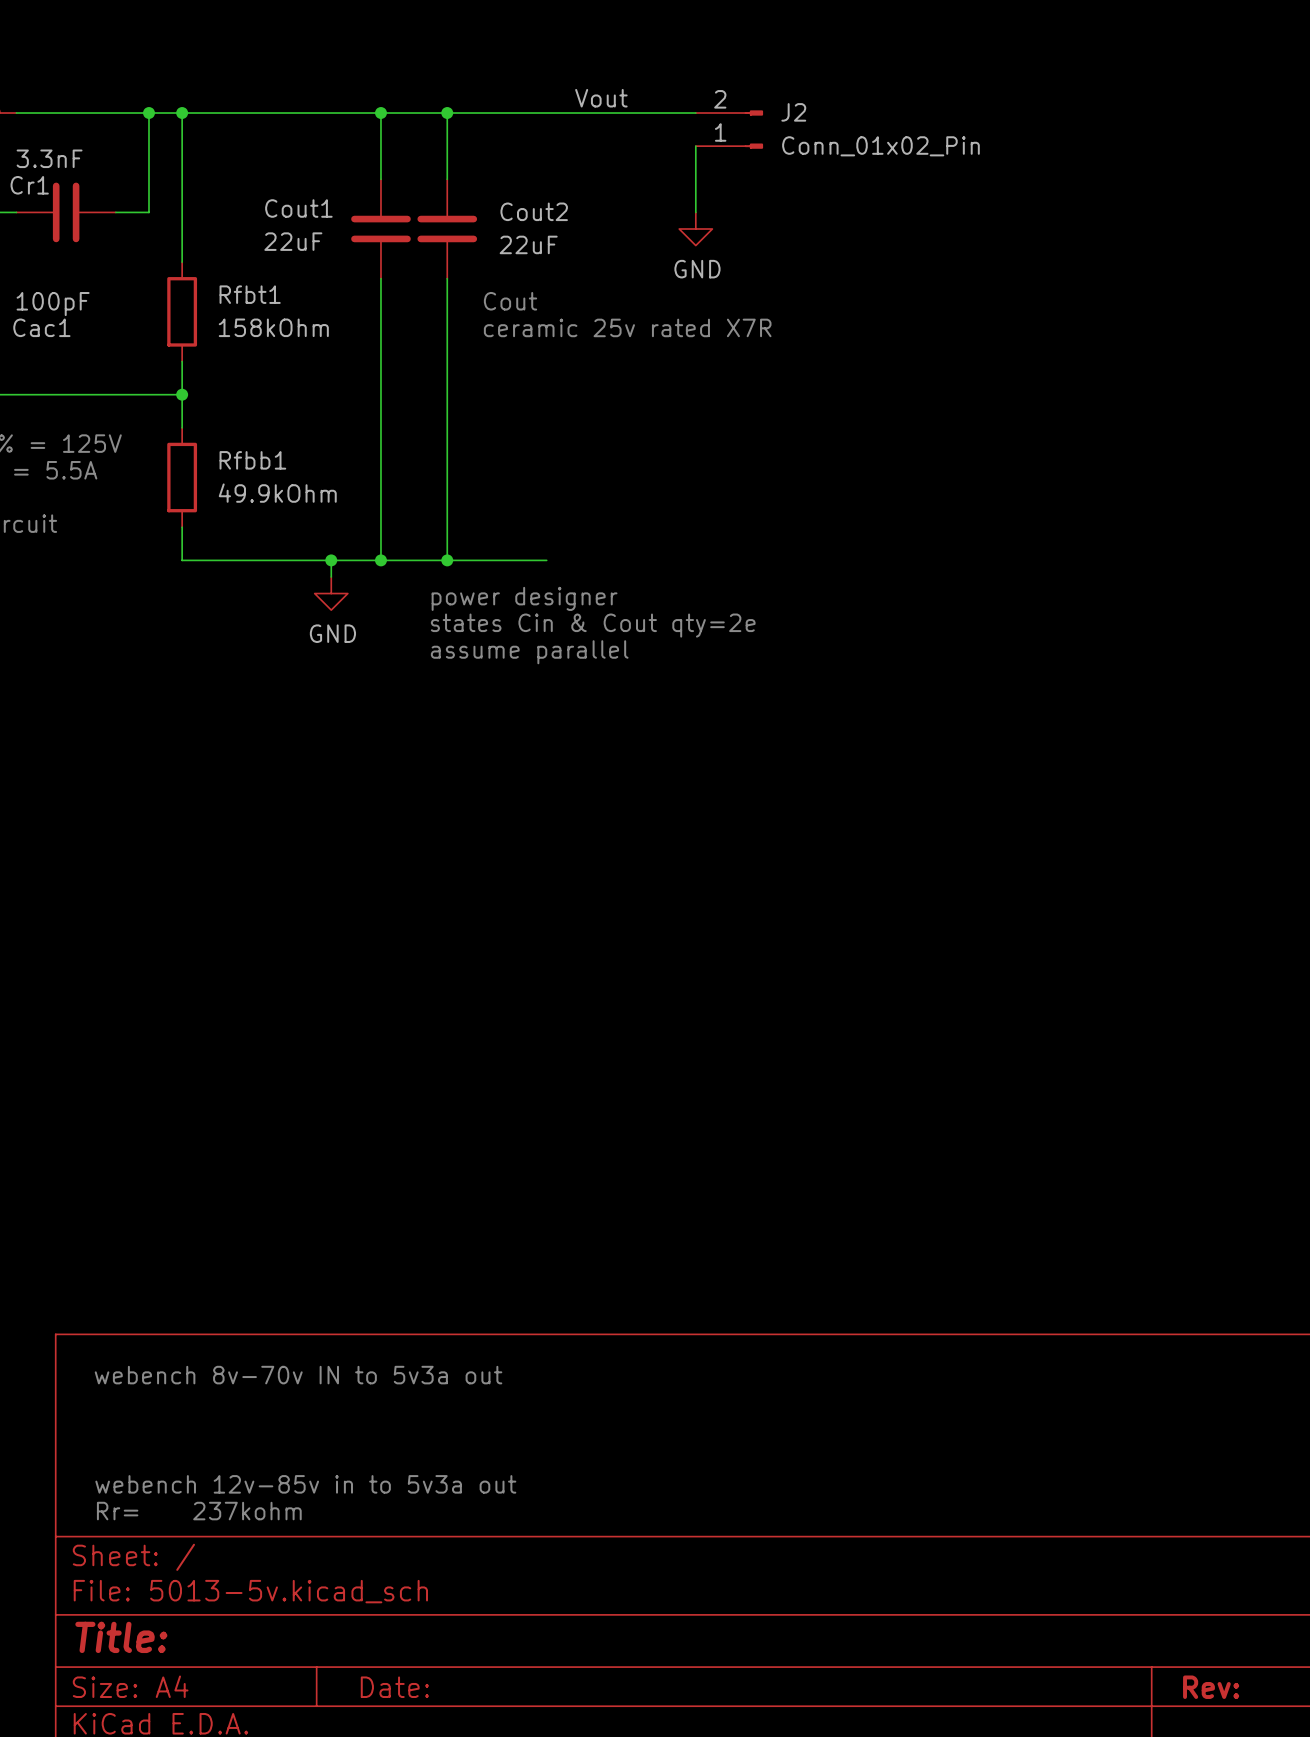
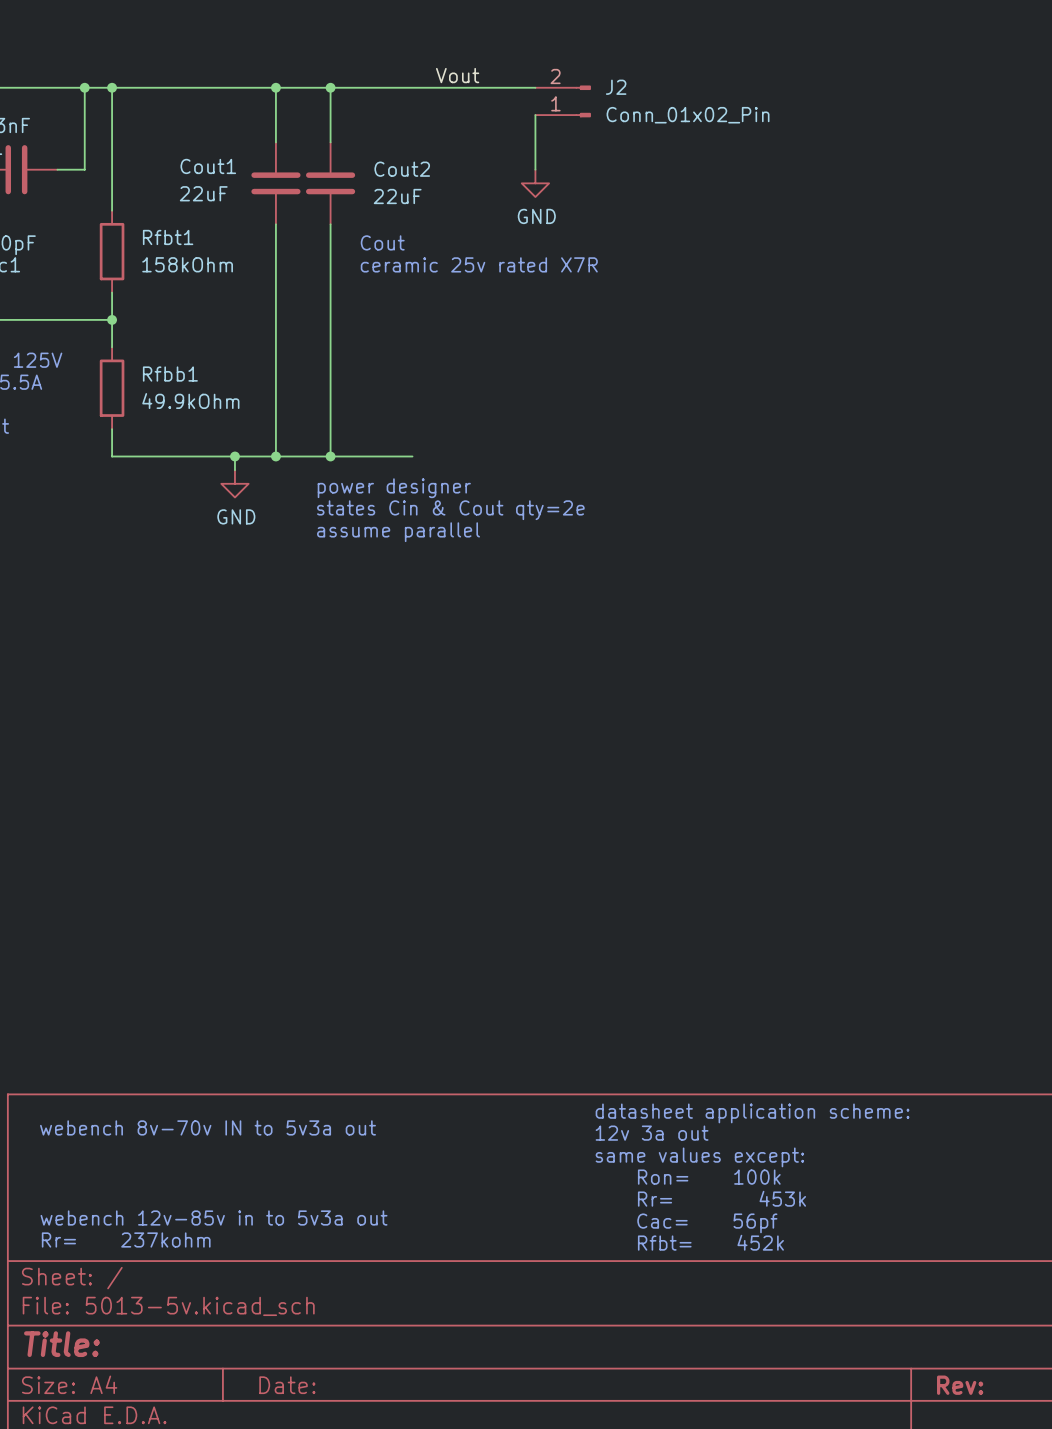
text: none -> datasheet application scheme: (752, 1113)
text: none -> 12v 3a out (652, 1133)
text: none -> same values except: (699, 1157)
text: none -> Ron= 100k (709, 1177)
text: none -> Rr= 453k (721, 1198)
text: none -> Cac= 56pf (707, 1223)
text: none -> Rfbt= 452k (710, 1242)

